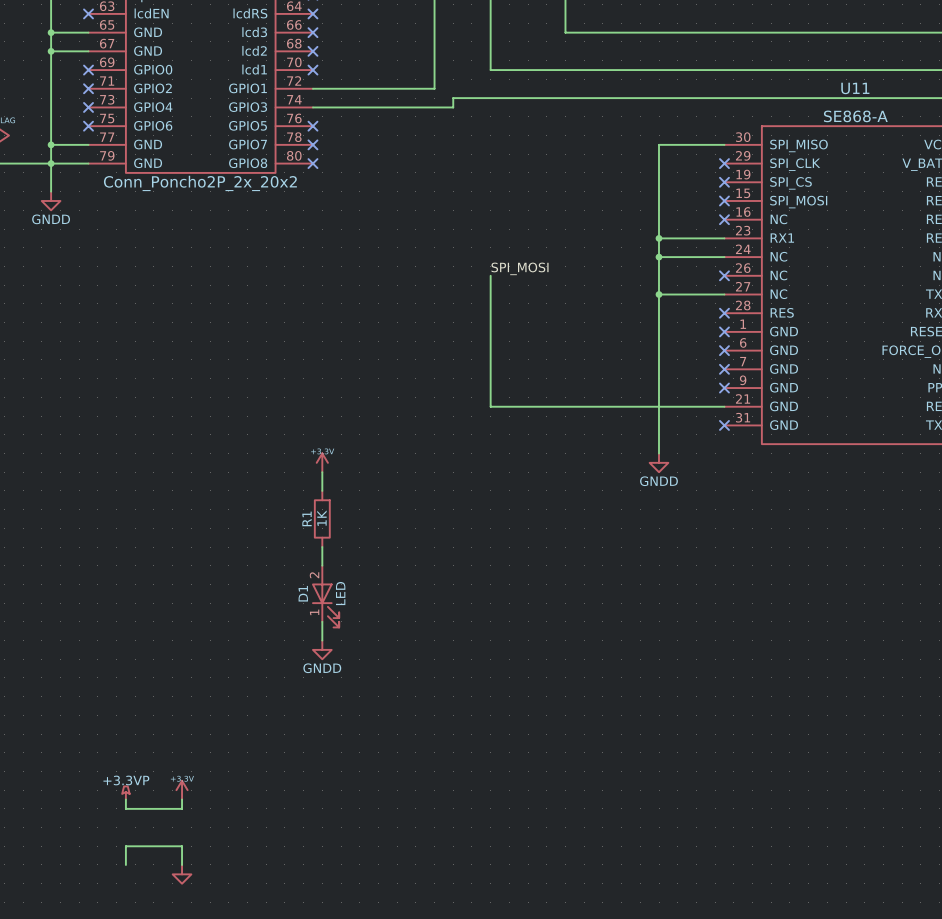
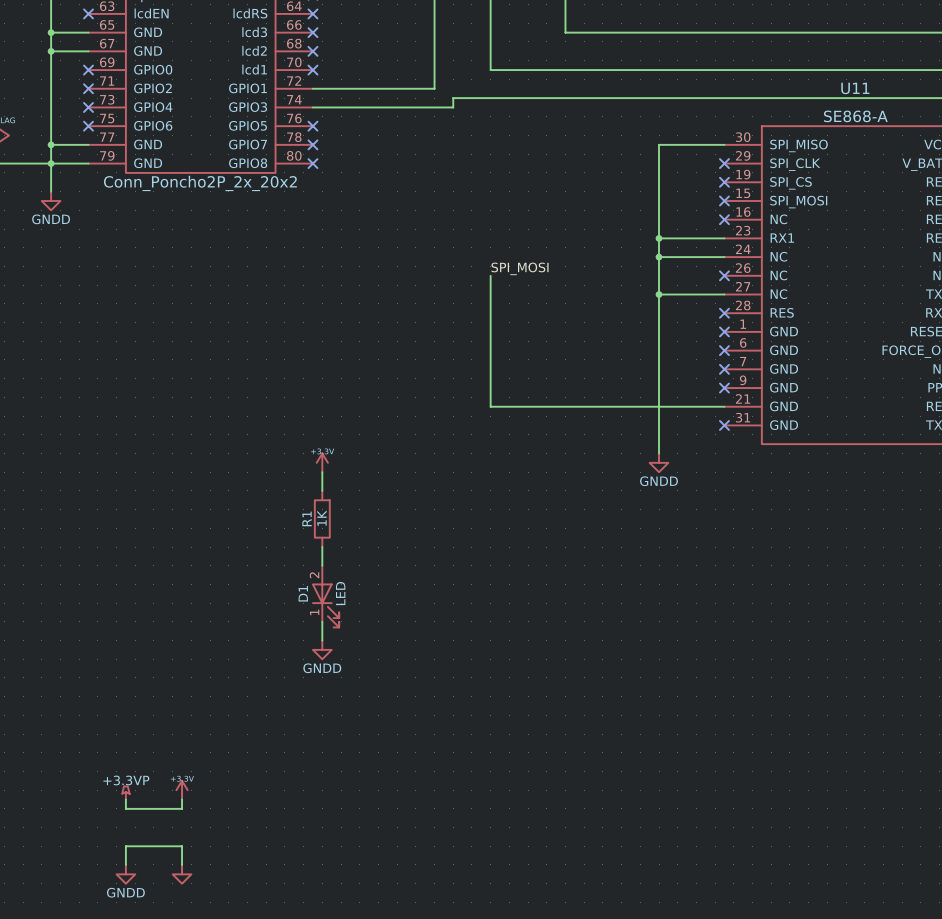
power symbol: none -> GNDD (125, 874)

